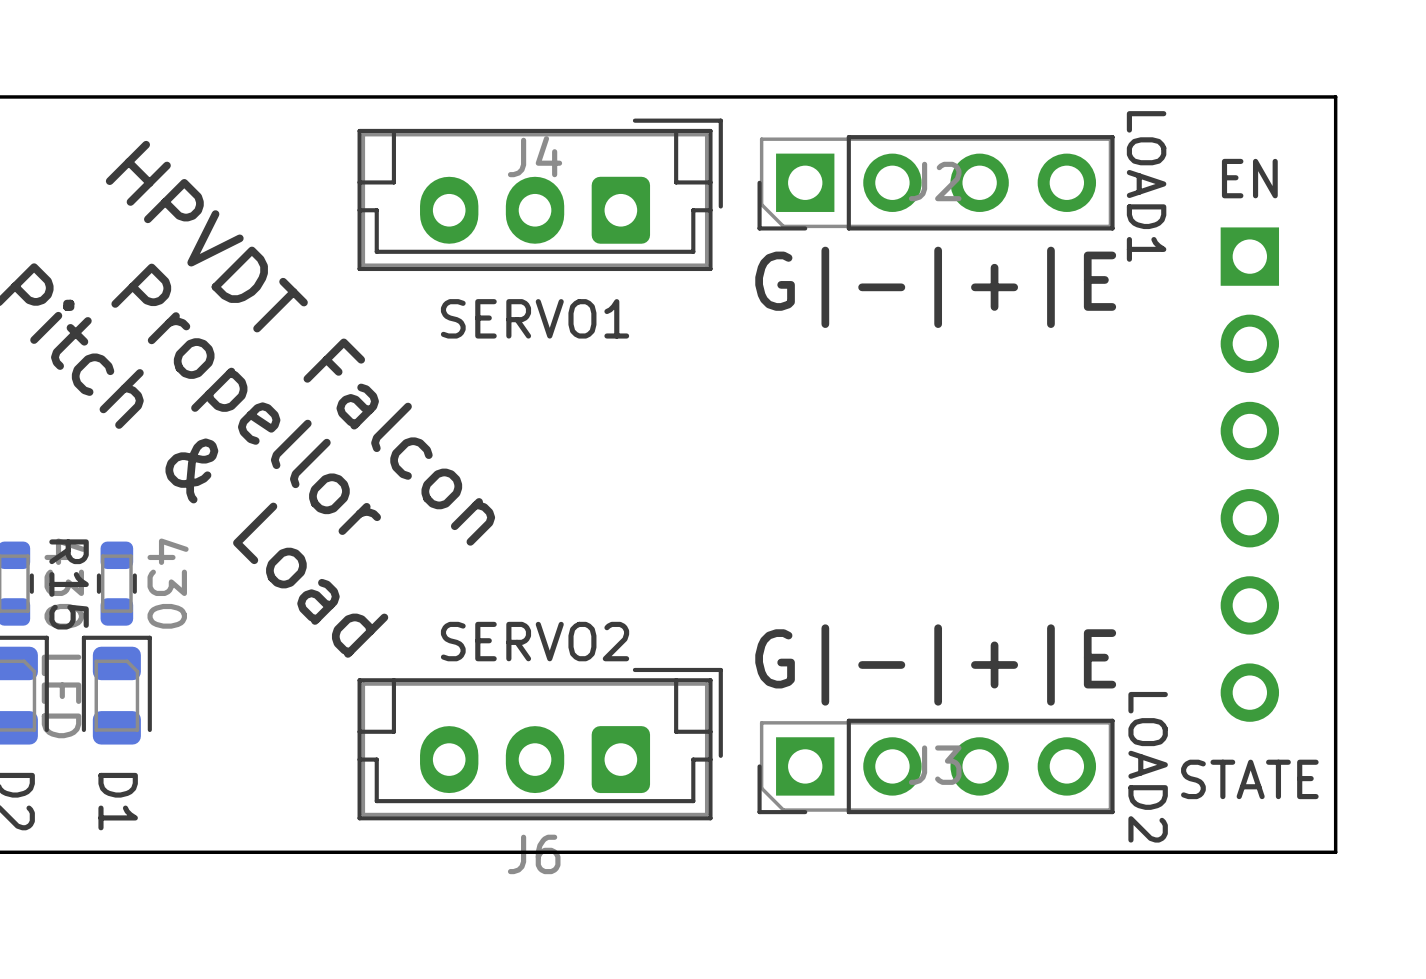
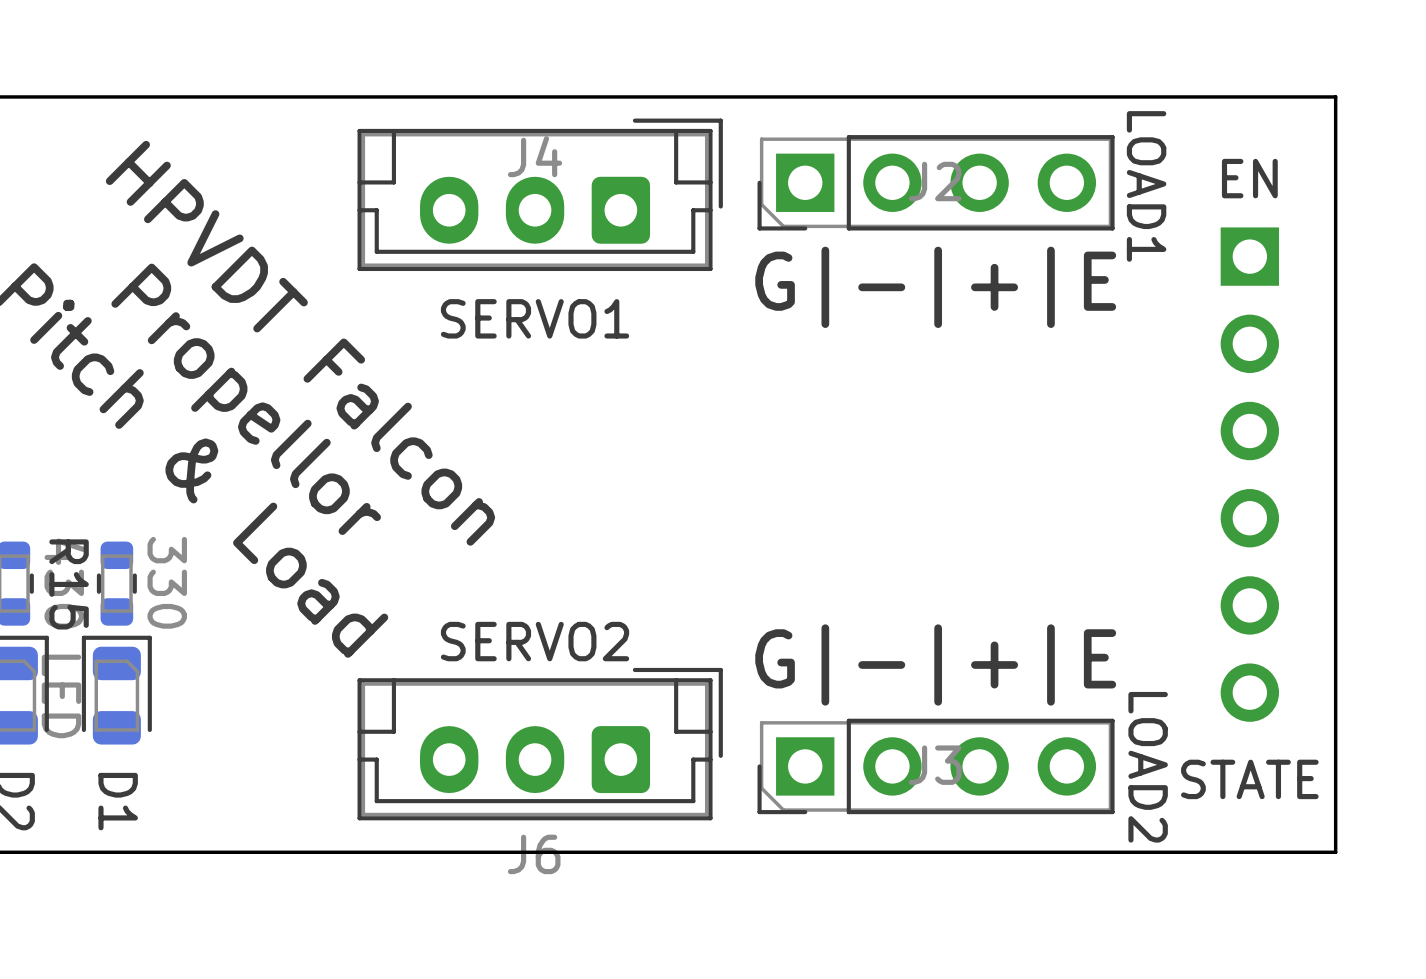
R15 value: 430 (168, 583) -> 330 (167, 582)

